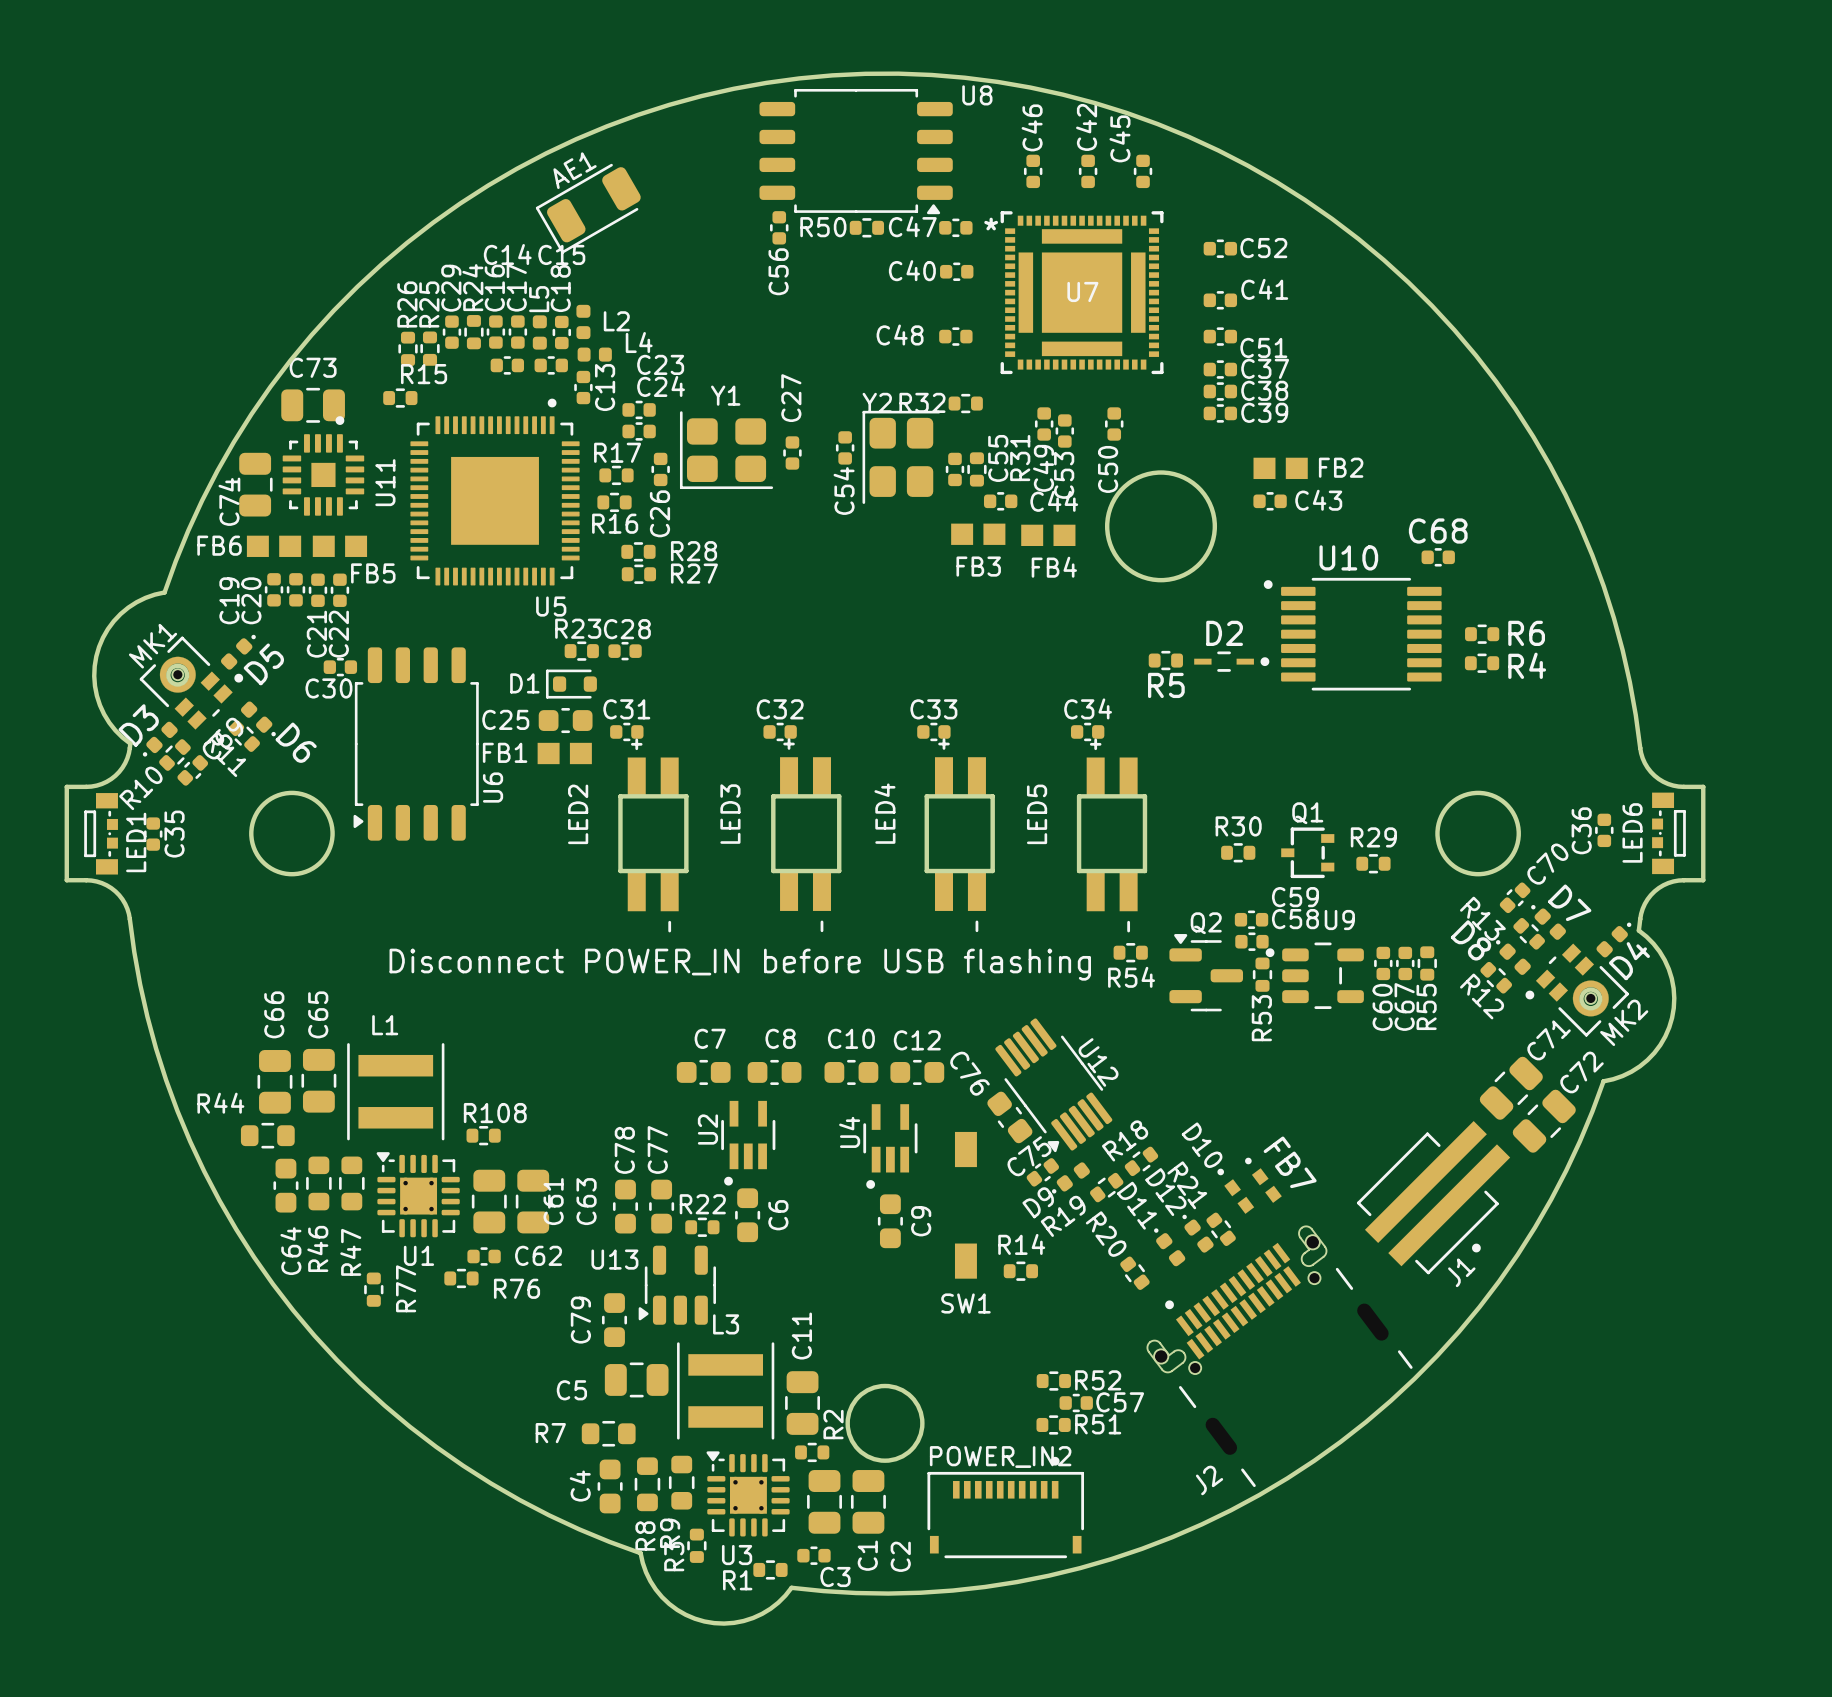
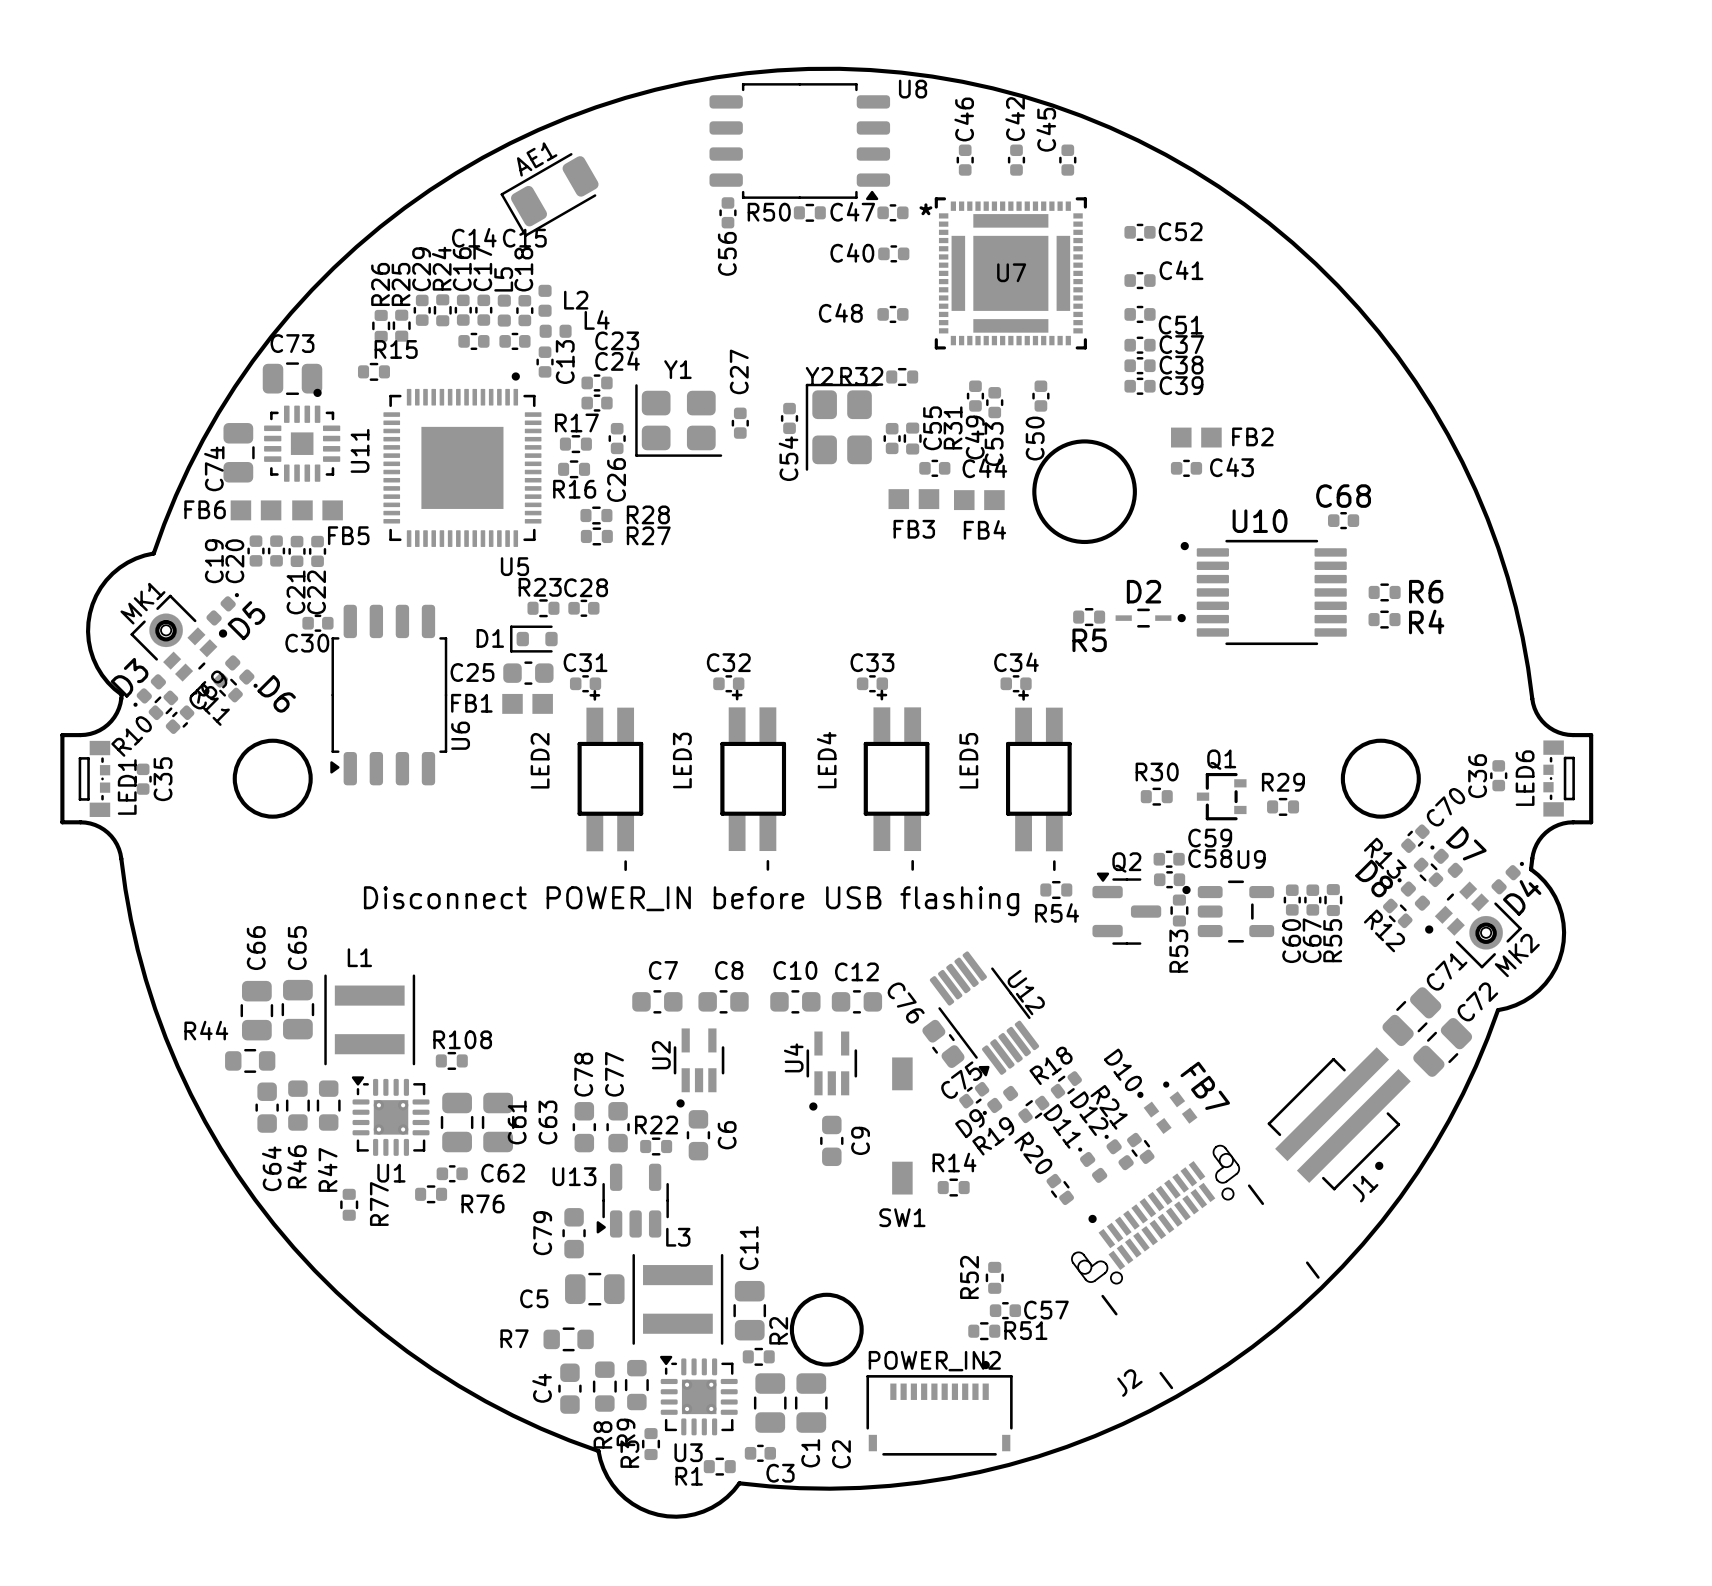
R52 name position: R52 (1098, 1380) -> R52 (969, 1277)
R52 rotation: 0° (1053, 1381) -> 90° clockwise (994, 1277)

